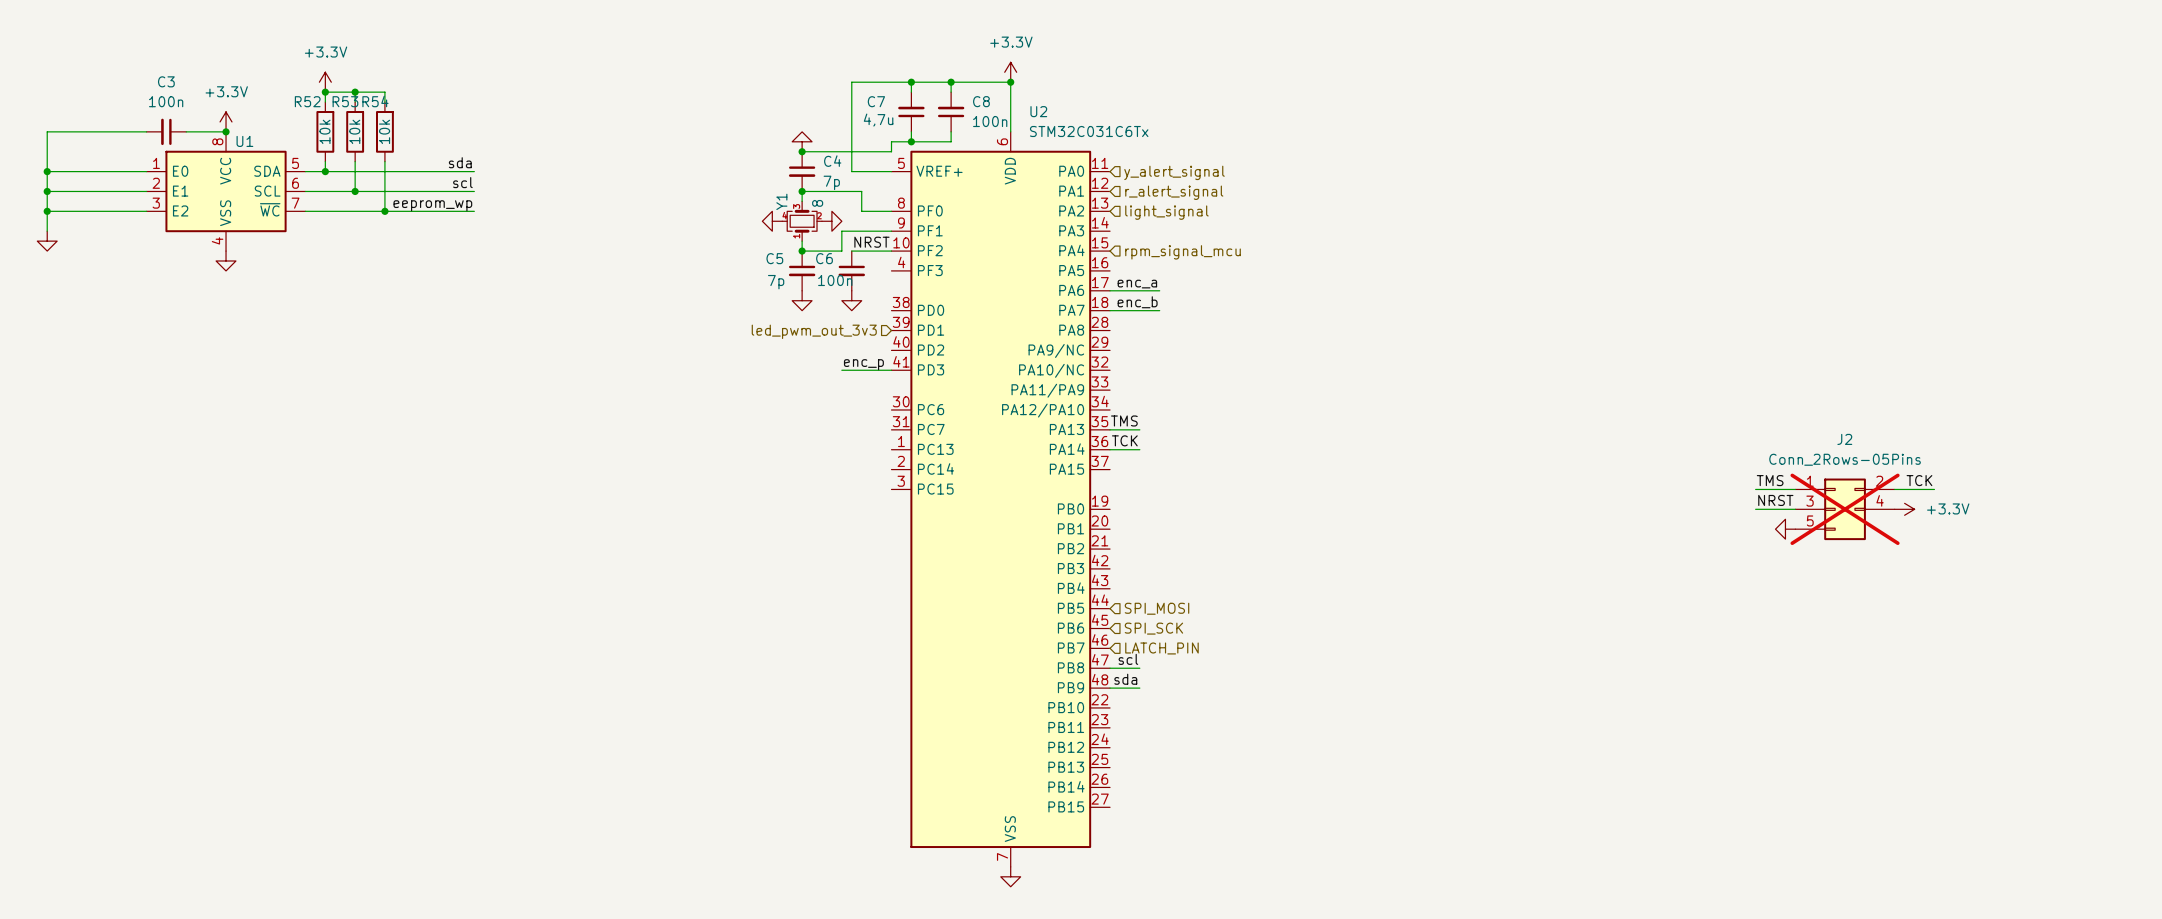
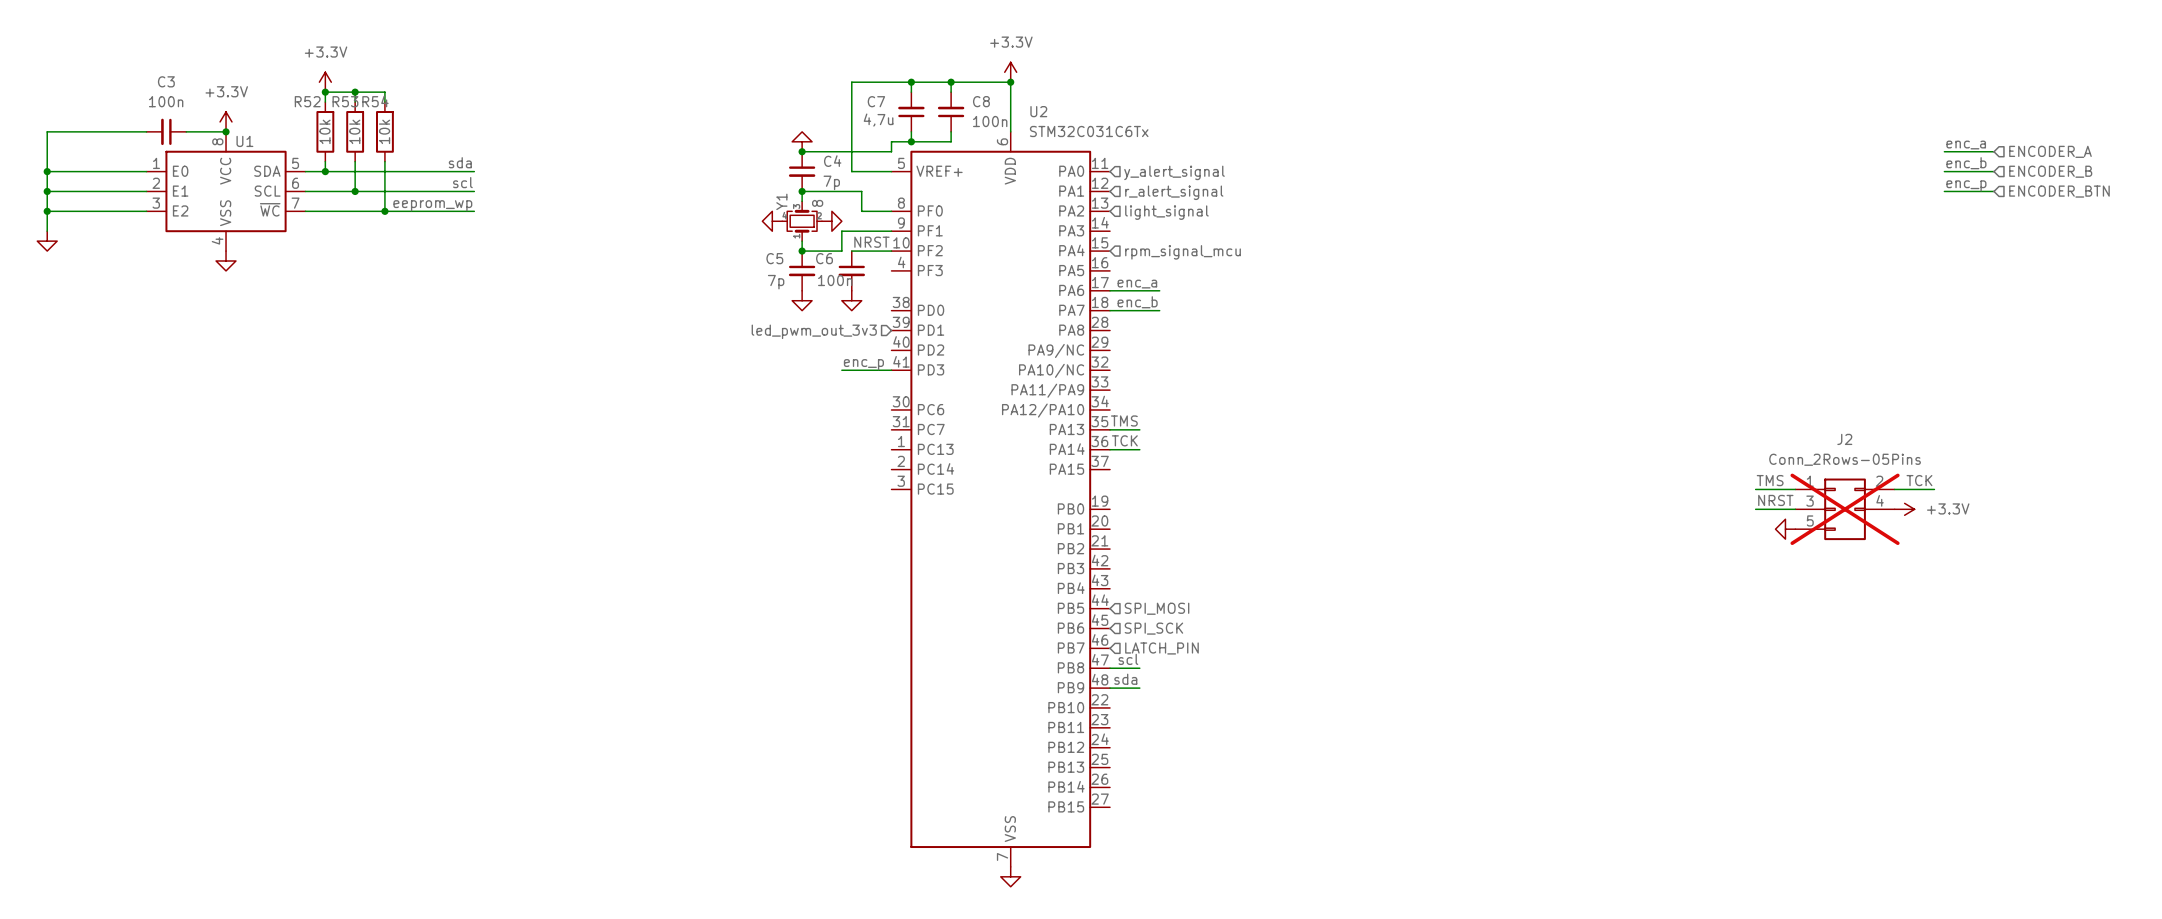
label: none -> enc_a (1966, 145)
wire: none -> (1944, 151) (1994, 151)
hierarchical label: none -> ENCODER_A (2050, 151)
label: none -> enc_b (1966, 163)
wire: none -> (1944, 171) (1994, 171)
hierarchical label: none -> ENCODER_B (2050, 171)
label: none -> enc_p (1966, 185)
wire: none -> (1944, 191) (1994, 191)
hierarchical label: none -> ENCODER_BTN (2059, 191)

